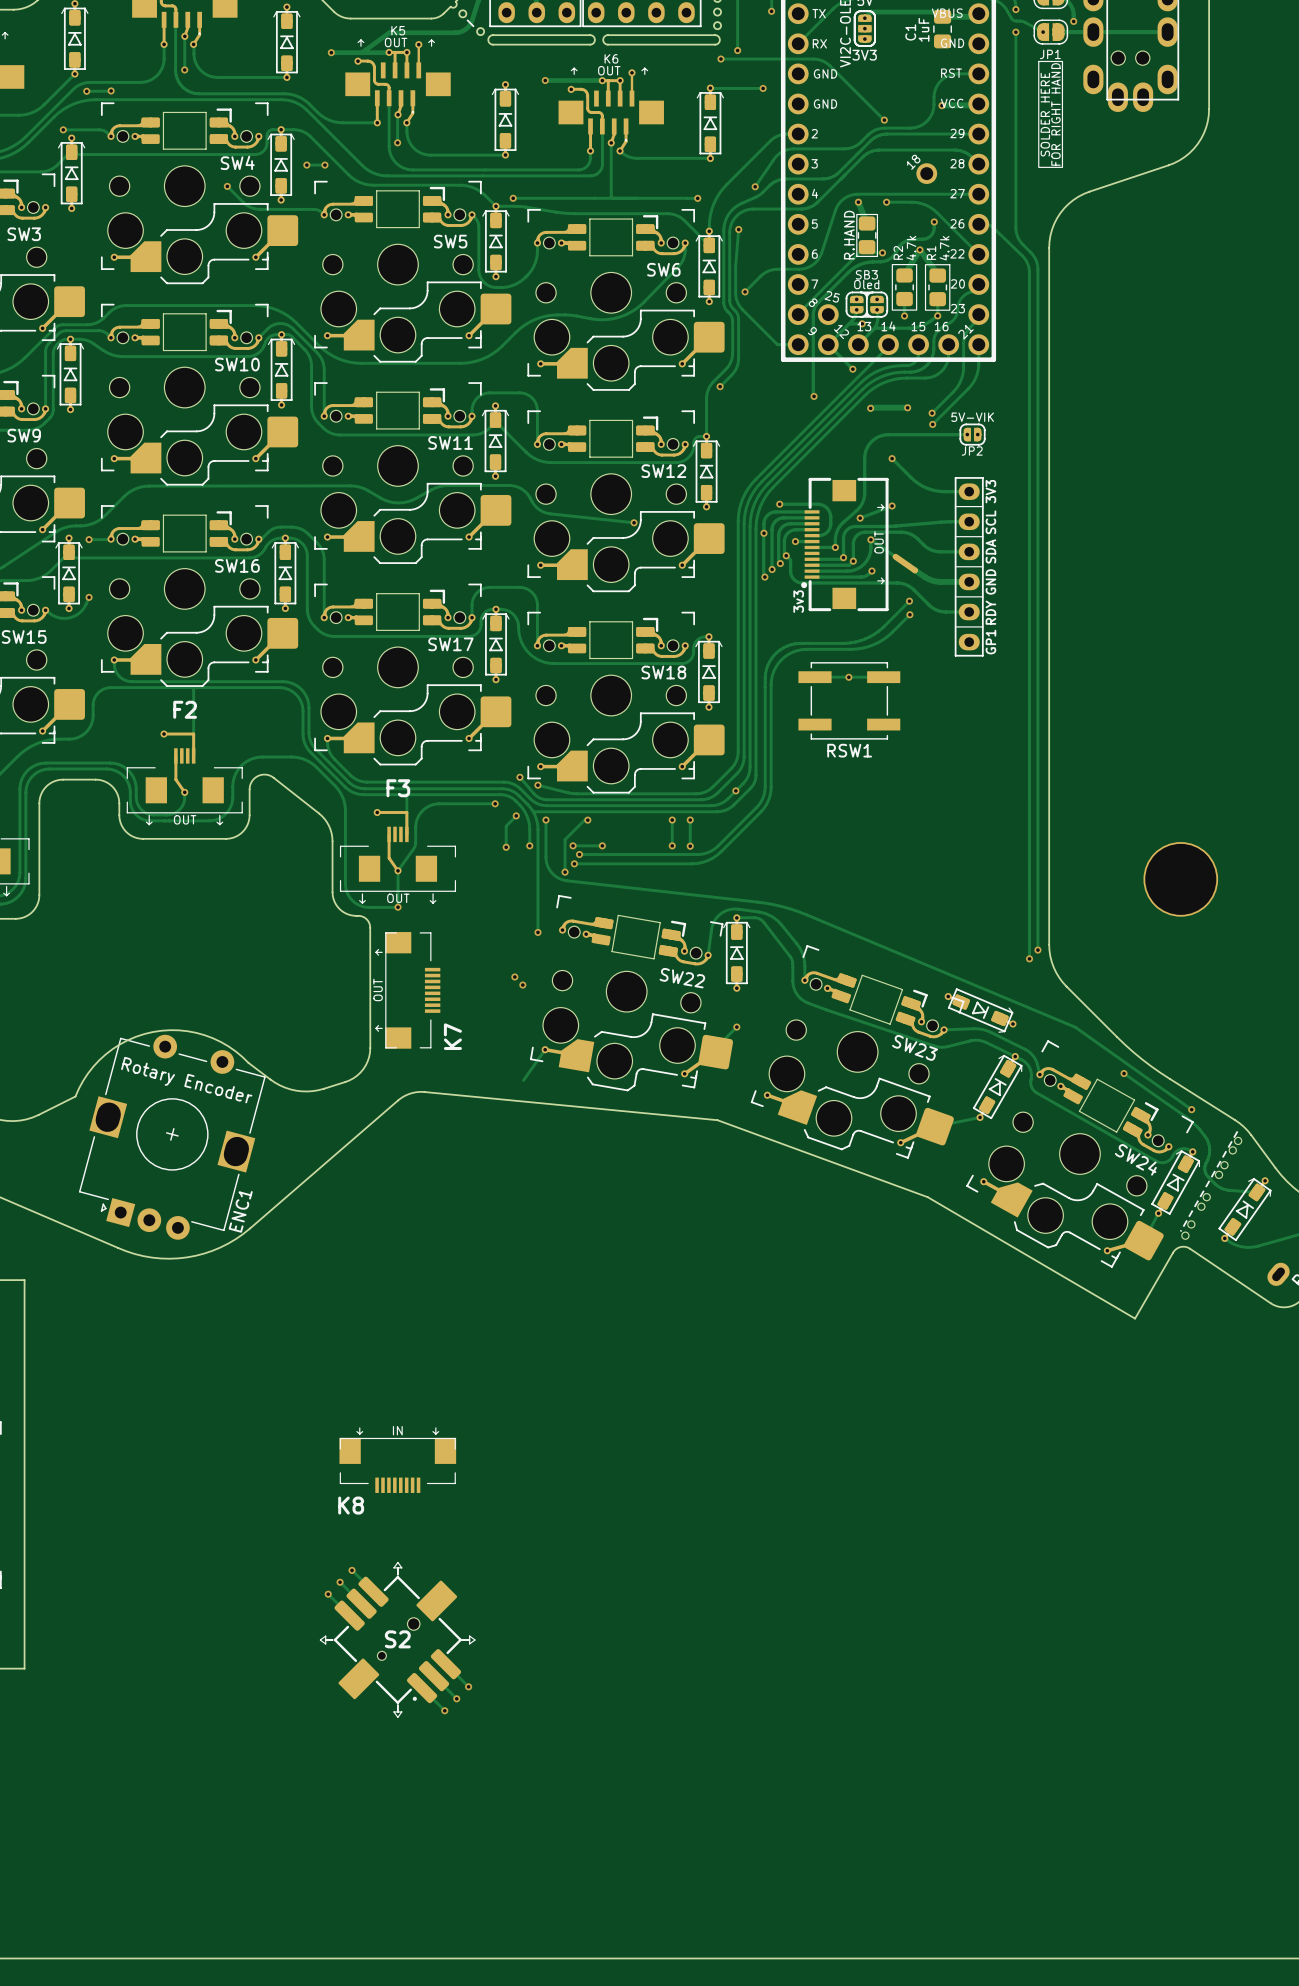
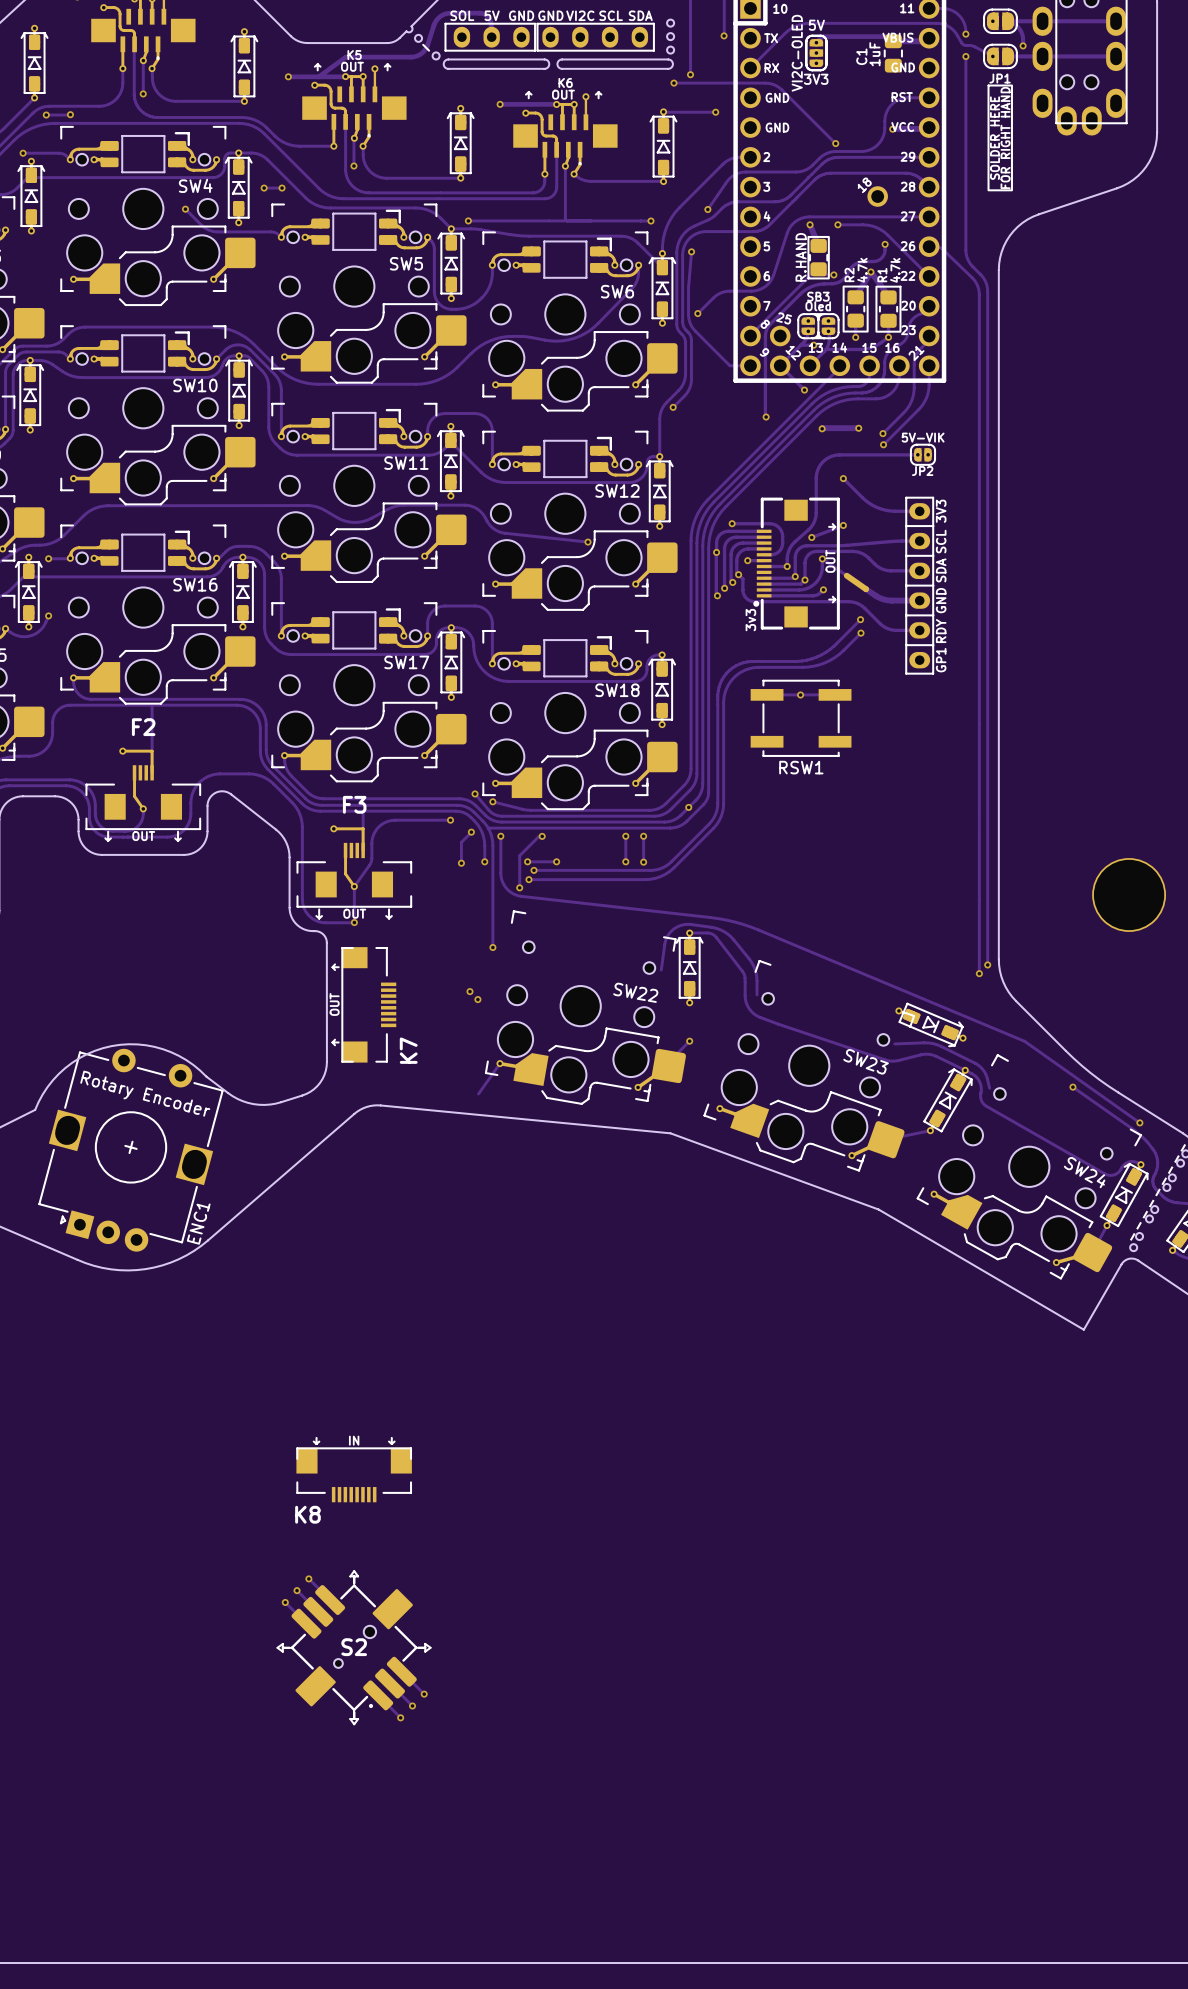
SW22 footprint: [530, 894, 734, 1092] -> [485, 910, 686, 1105]
SW23 footprint: [750, 945, 965, 1159] -> [703, 960, 915, 1172]
SW24 footprint: [966, 1040, 1194, 1268] -> [916, 1054, 1142, 1280]

